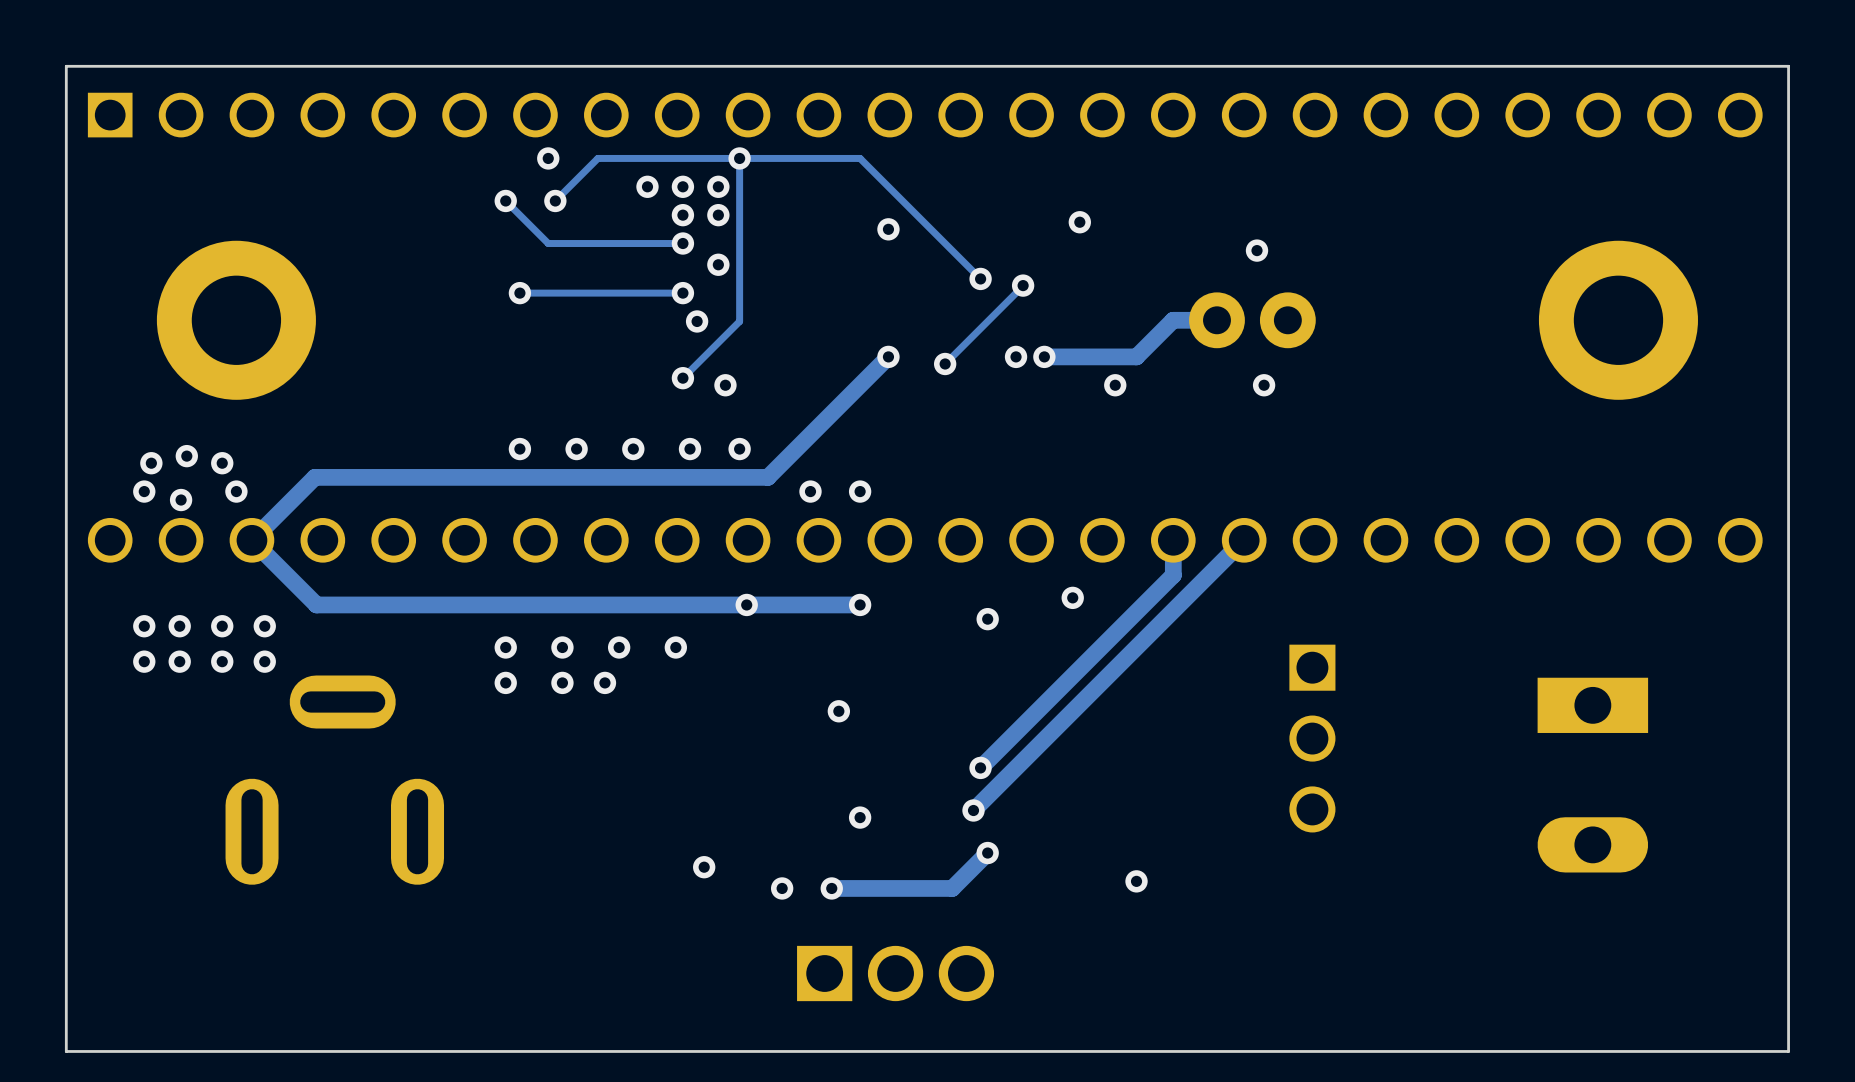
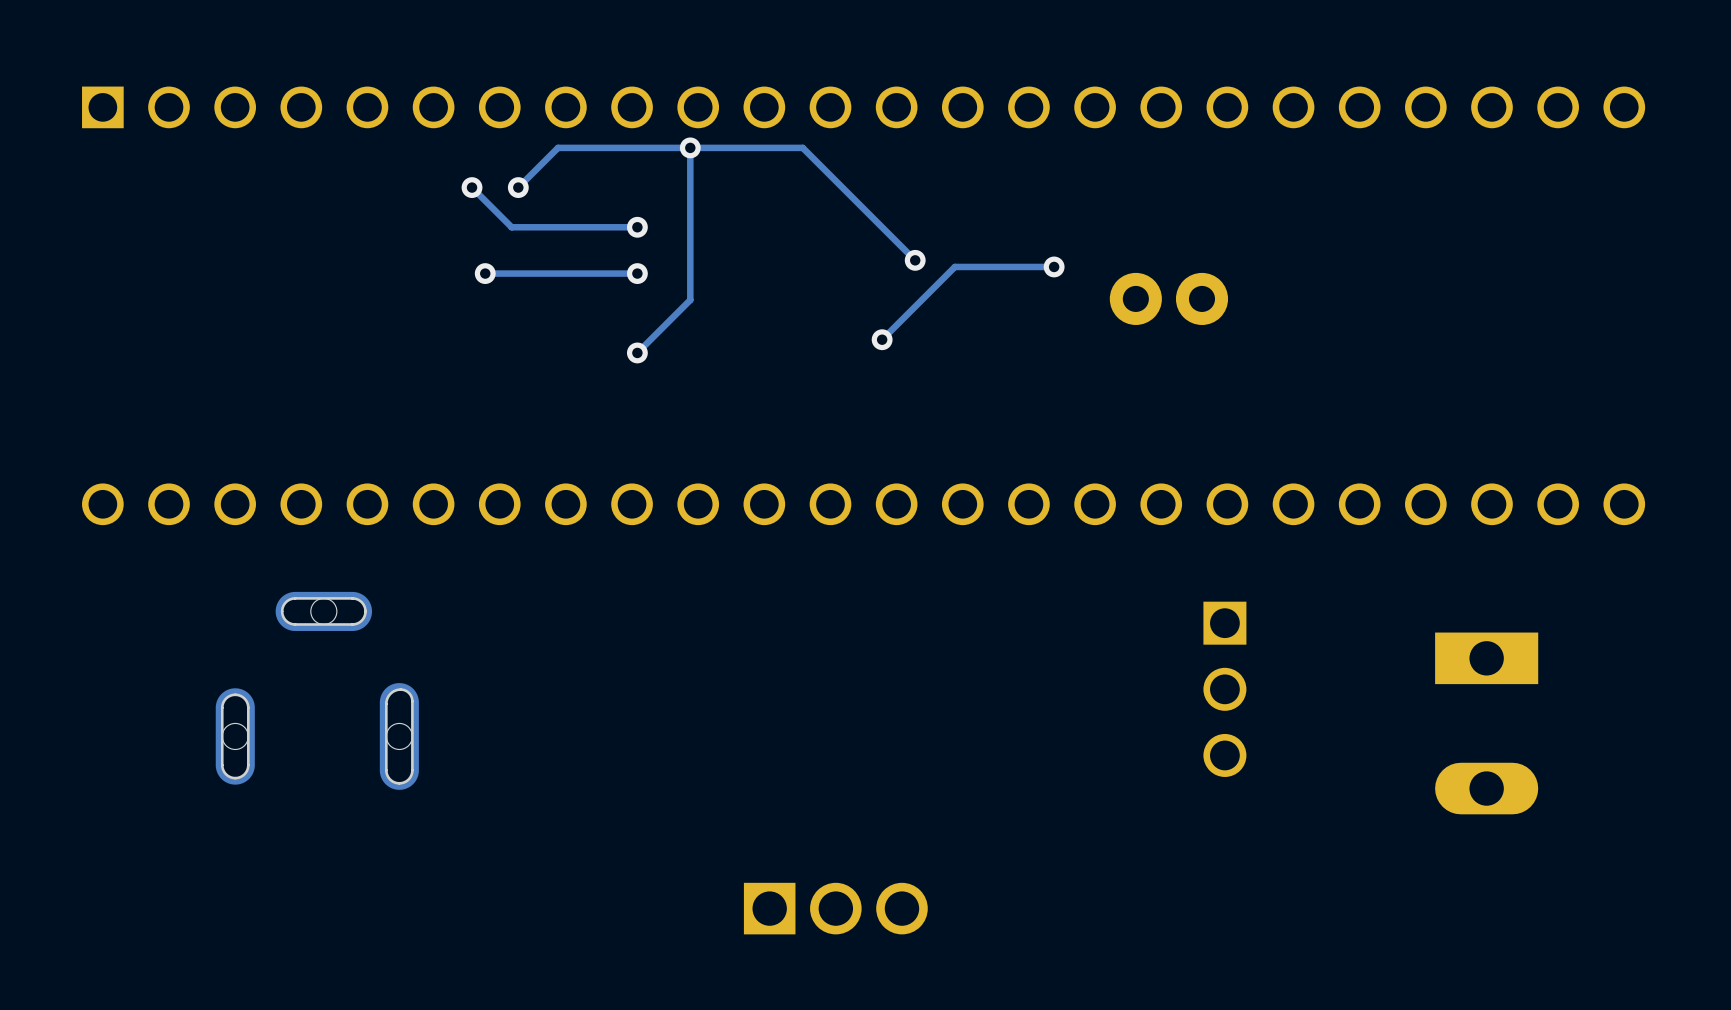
board edge: (1788, 66) (66, 66) (66, 1051) (1788, 1051) (1788, 66) -> none
via: (548, 158) -> none
via: (647, 186) -> none
via: (682, 186) -> none
via: (718, 186) -> none
via: (682, 215) -> none
via: (718, 215) -> none
via: (1079, 222) -> none
via: (888, 229) -> none
via: (1257, 250) -> none
via: (718, 264) -> none
via: (1023, 285) -> none
track: none -> (1054, 266) (954, 266)
via: none -> (1054, 266)
part: (236, 320) -> none
track: (1216, 320) (1173, 320) (1136, 356) (1044, 356) -> none
part: (1618, 320) -> none
via: (697, 321) -> none
track: (888, 356) (767, 477) (314, 477) (251, 540) (316, 604) (860, 604) -> none
via: (888, 356) -> none
via: (1016, 356) -> none
via: (1044, 356) -> none
via: (725, 385) -> none
via: (1115, 385) -> none
via: (1264, 385) -> none
via: (519, 449) -> none
via: (576, 449) -> none
via: (633, 449) -> none
via: (690, 449) -> none
via: (739, 449) -> none
via: (186, 456) -> none
via: (151, 463) -> none
via: (222, 463) -> none
via: (144, 491) -> none
via: (236, 491) -> none
via: (810, 491) -> none
via: (860, 491) -> none
via: (181, 500) -> none
track: (1173, 540) (1173, 575) (980, 767) -> none
track: (1243, 540) (973, 810) -> none
via: (1072, 597) -> none
via: (746, 604) -> none
via: (860, 604) -> none
via: (987, 619) -> none
via: (144, 626) -> none
via: (179, 626) -> none
via: (222, 626) -> none
via: (264, 626) -> none
via: (505, 647) -> none
via: (562, 647) -> none
via: (619, 647) -> none
via: (675, 647) -> none
via: (144, 661) -> none
via: (179, 661) -> none
via: (222, 661) -> none
via: (264, 661) -> none
via: (505, 682) -> none
via: (562, 682) -> none
via: (604, 682) -> none
via: (838, 711) -> none
part: none -> (317, 690)
via: (980, 767) -> none
part: (334, 780) -> none
via: (973, 810) -> none
via: (860, 817) -> none
track: (987, 853) (952, 888) (831, 888) -> none
via: (987, 853) -> none
via: (704, 867) -> none
via: (1136, 881) -> none
via: (782, 888) -> none
via: (831, 888) -> none

